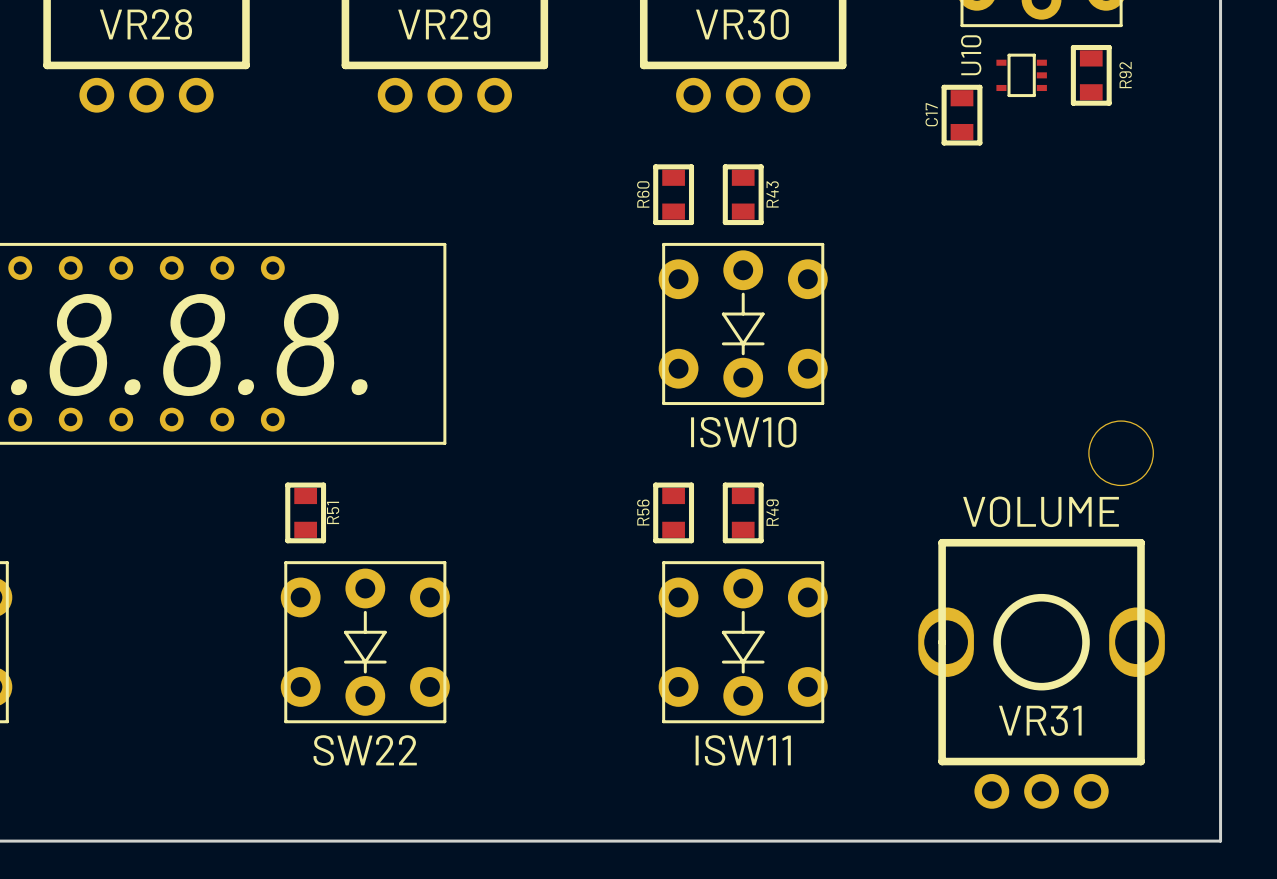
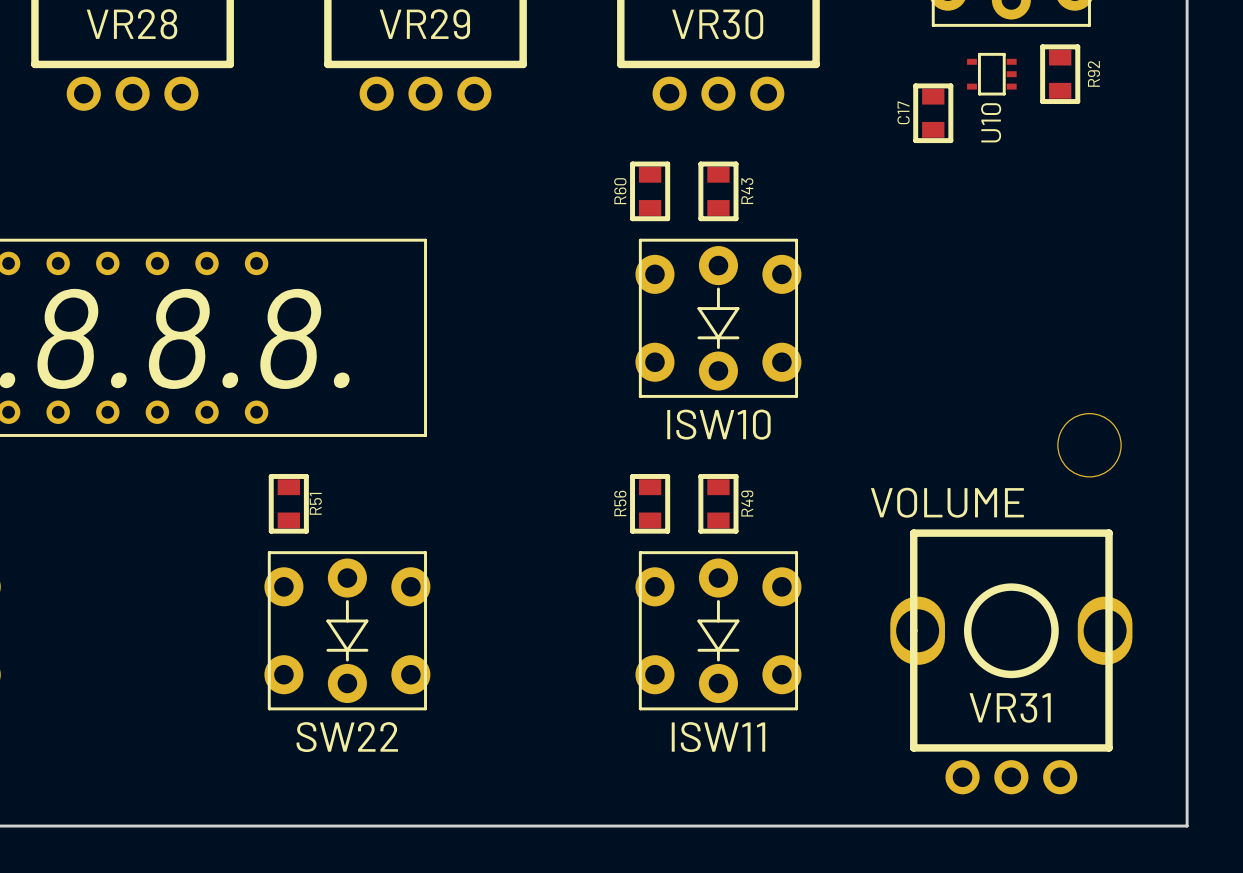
U10 name position: U10 (971, 55) -> U10 (991, 122)
VR31 value position: VOLUME (1041, 511) -> VOLUME (947, 502)

